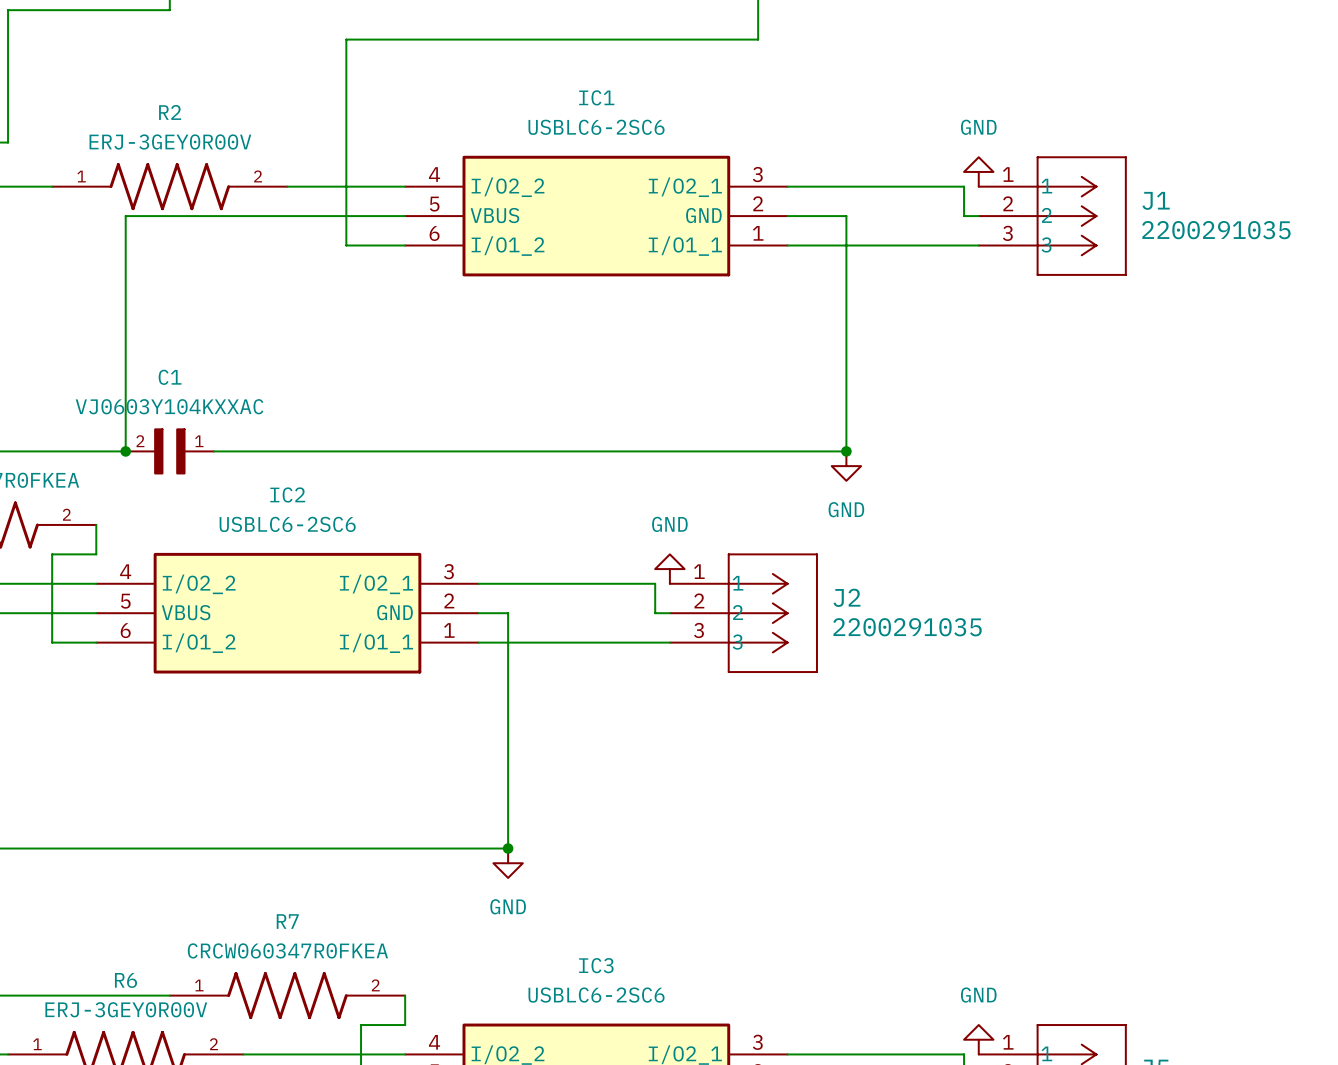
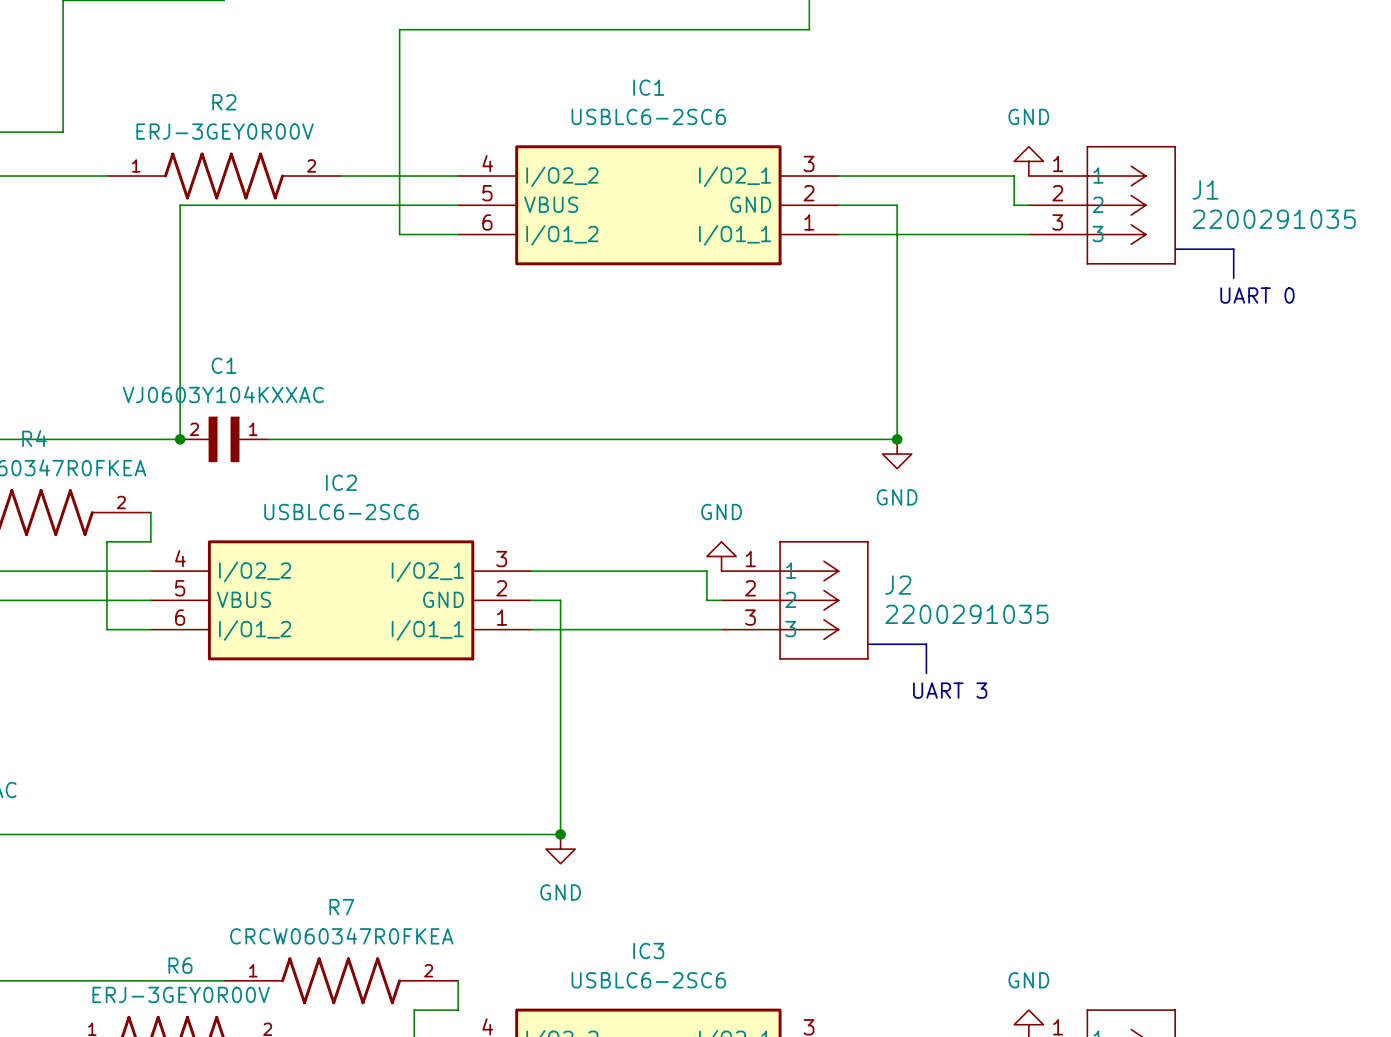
line: none -> (1175, 249) (1233, 249) (1233, 278)
text: none -> UART 0 (1257, 295)
line: none -> (867, 644) (926, 644) (926, 673)
text: none -> UART 3 (950, 690)

